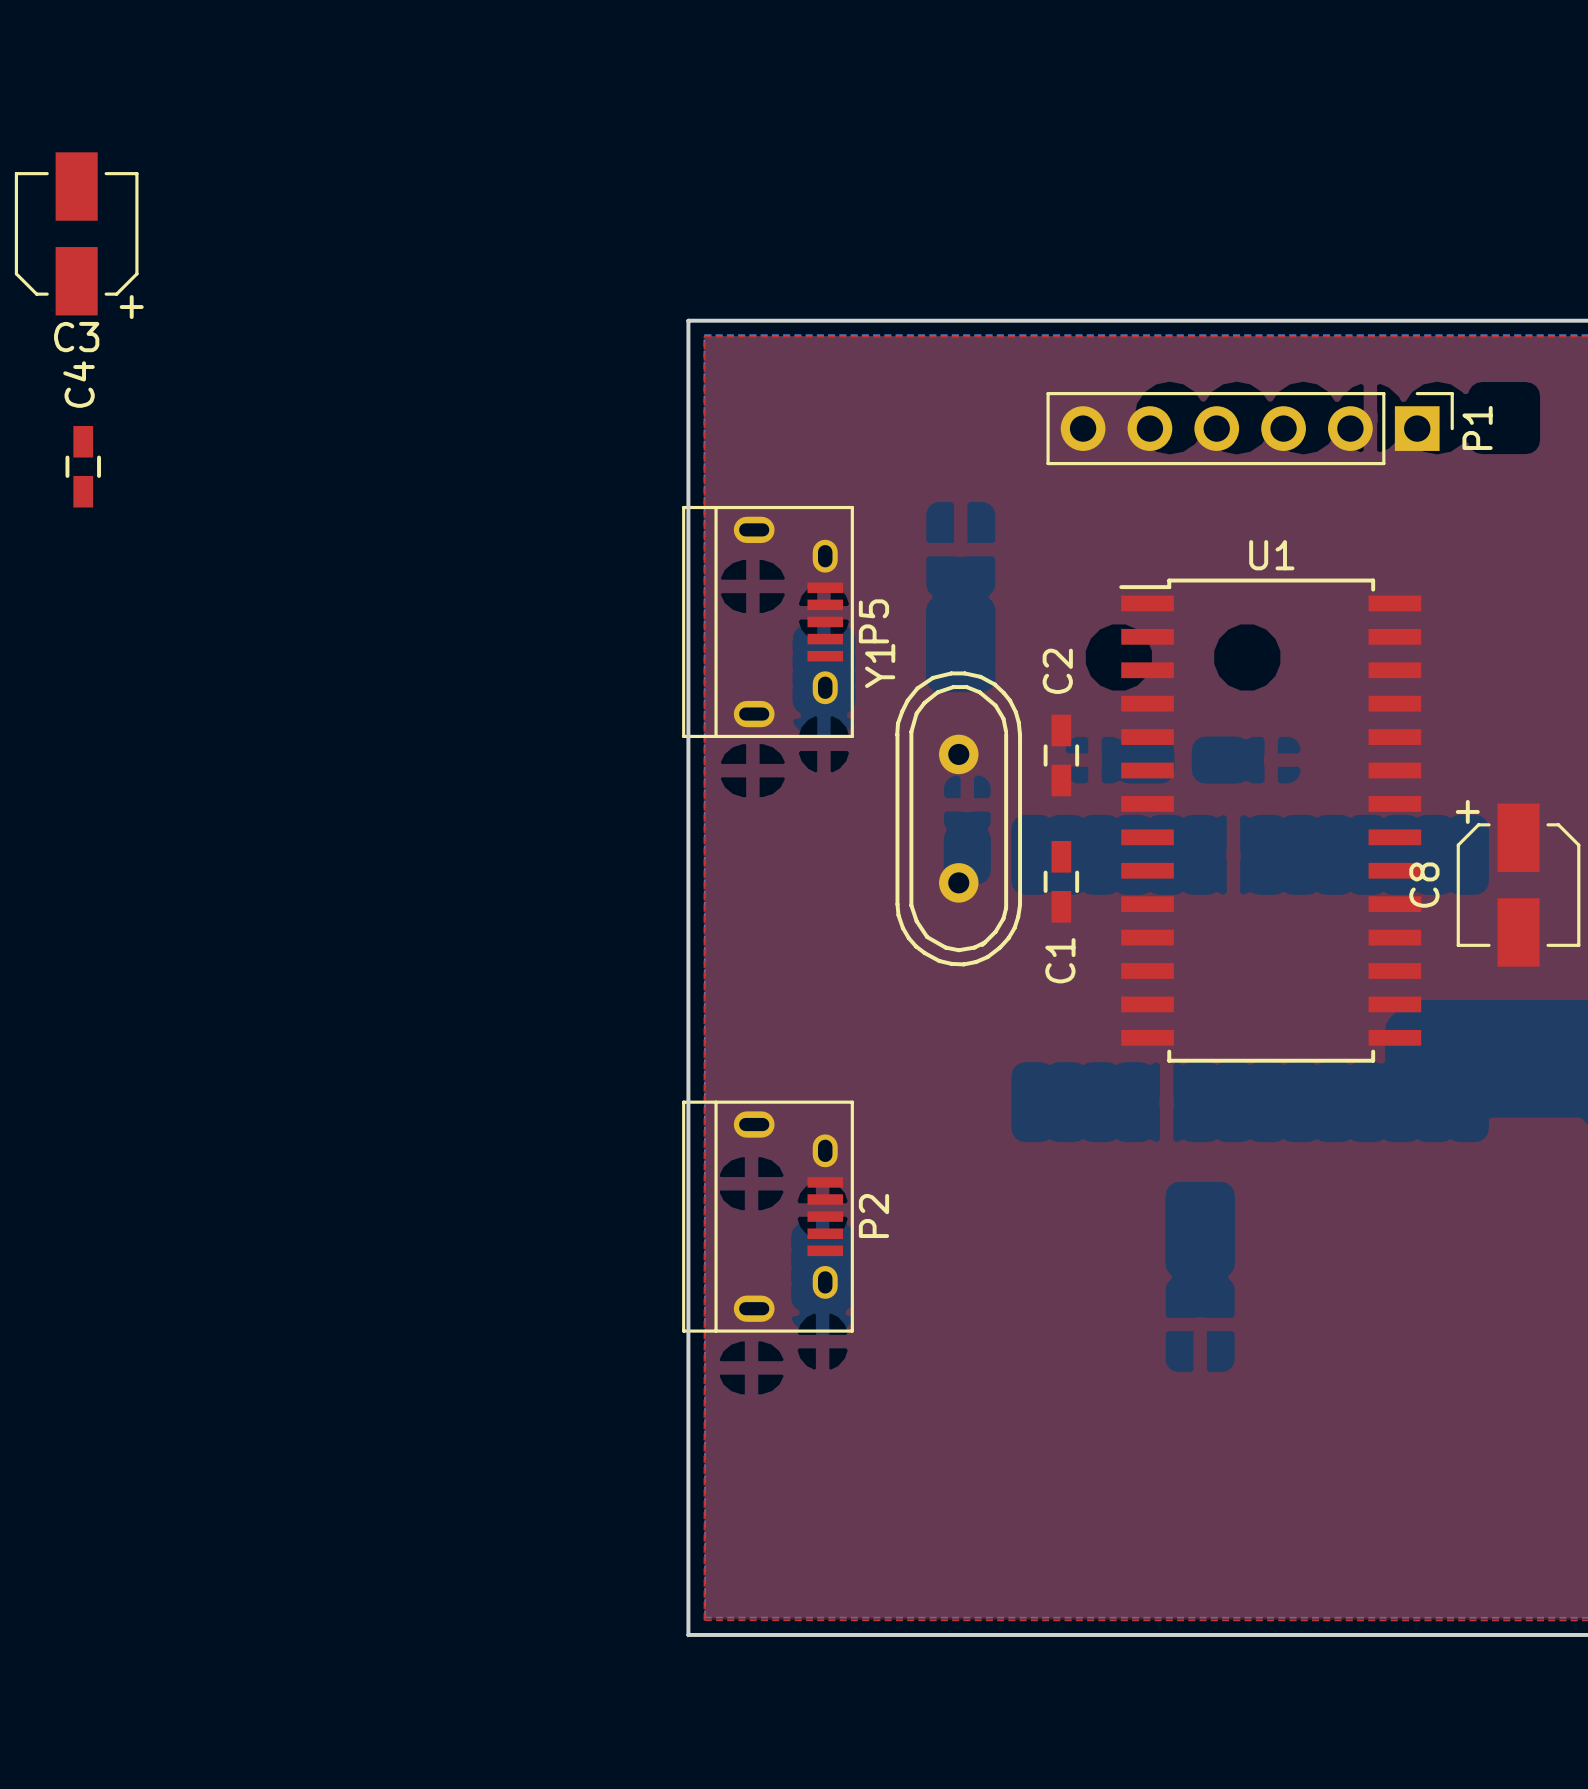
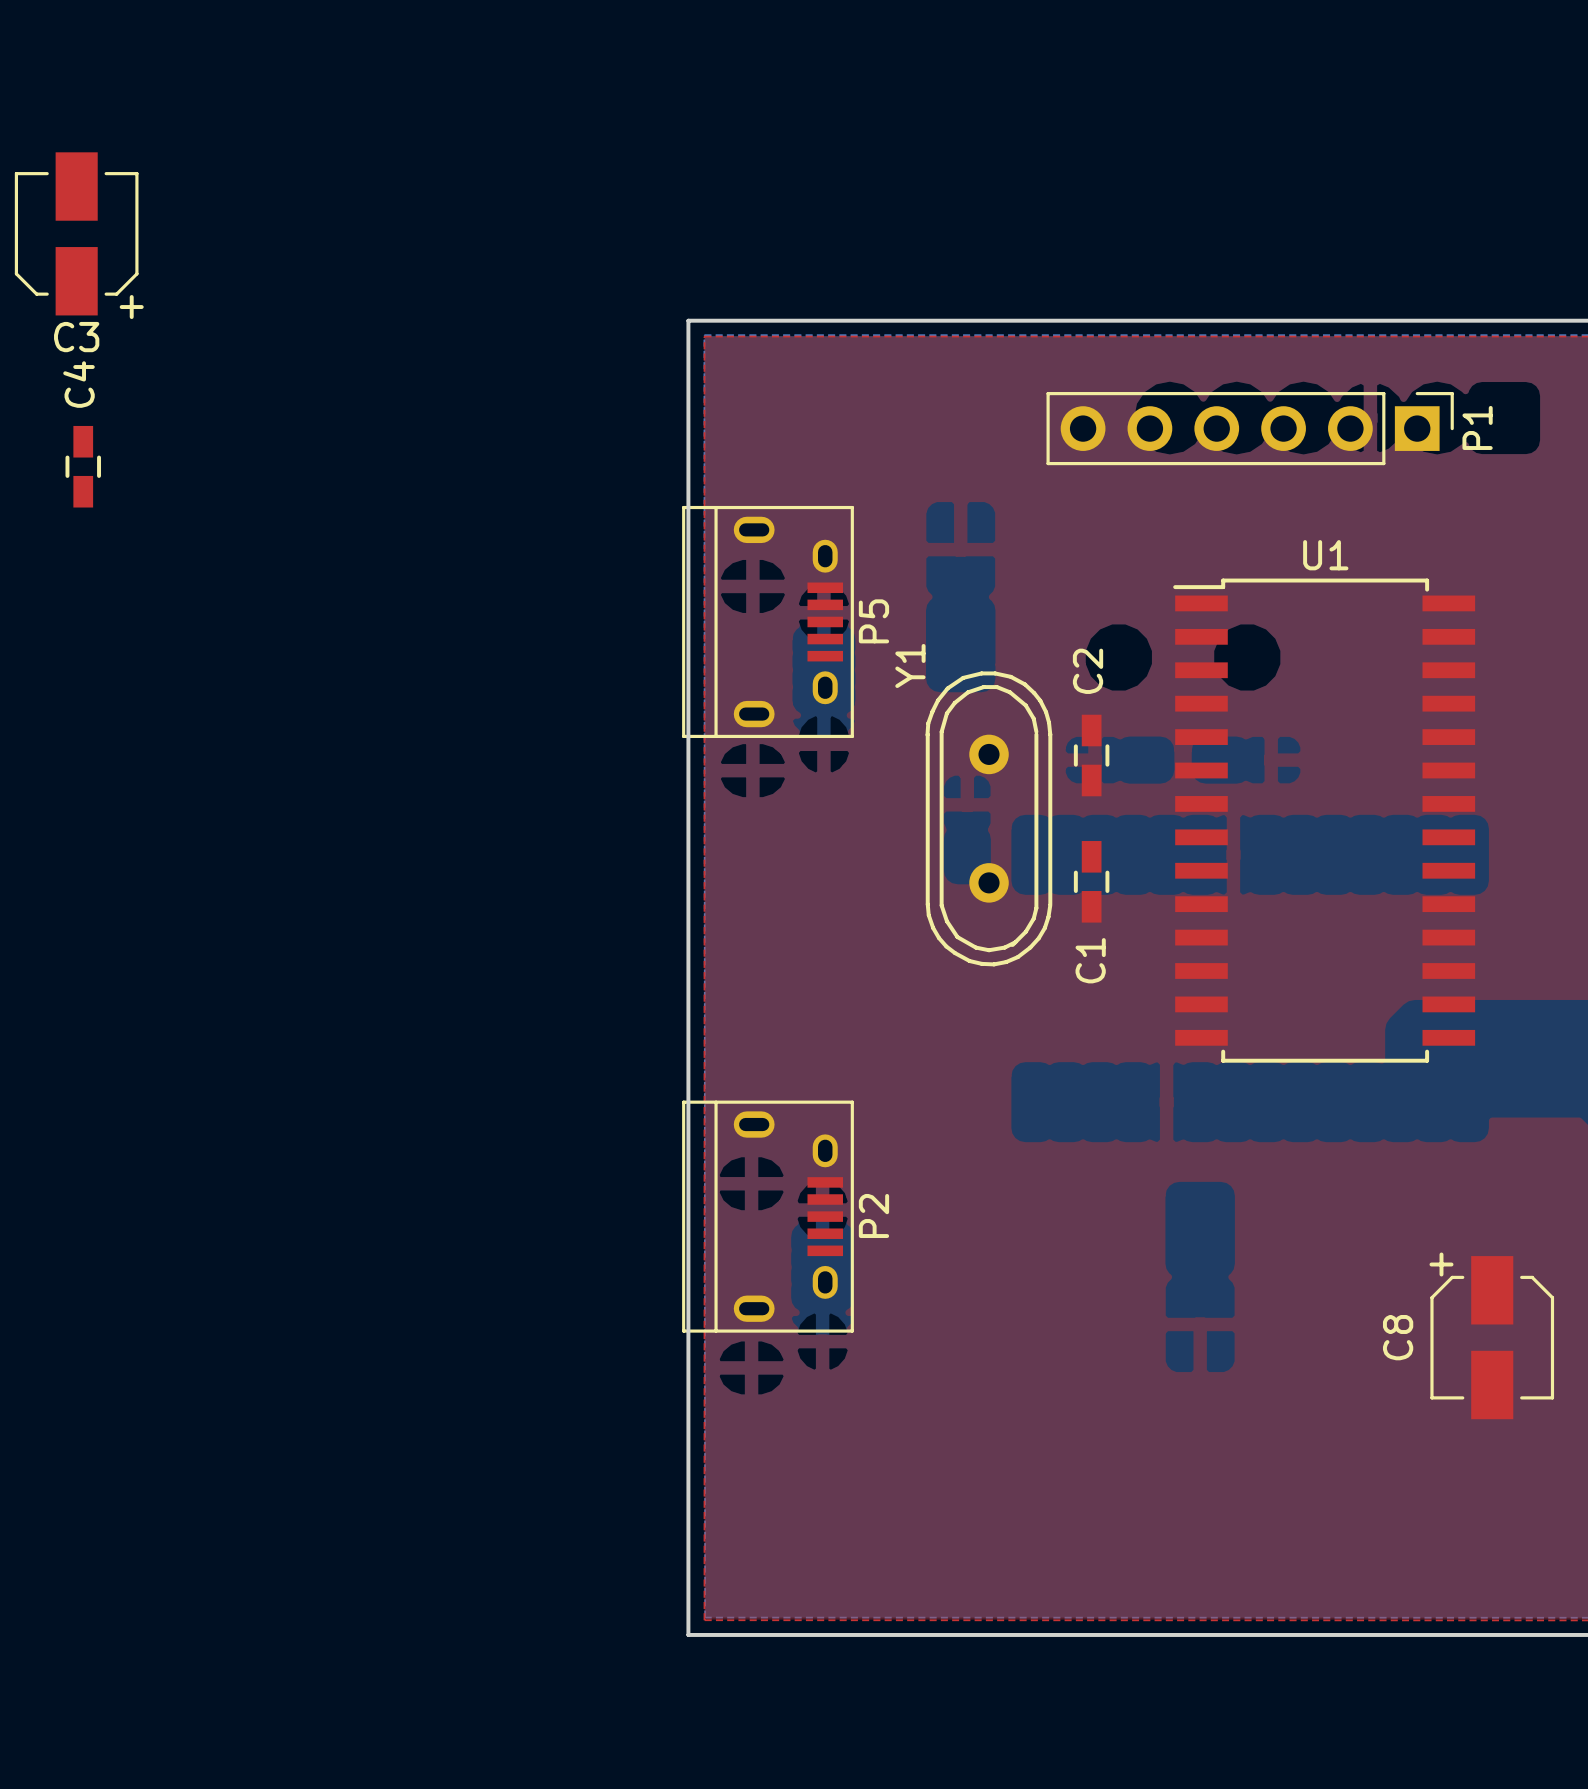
C2 position: (1061, 755) -> (1091, 755)
Y1 position: (958, 818) -> (988, 818)
U1 position: (1270, 820) -> (1324, 820)
C1 position: (1061, 881) -> (1091, 881)
C8 position: (1518, 885) -> (1492, 1337)

